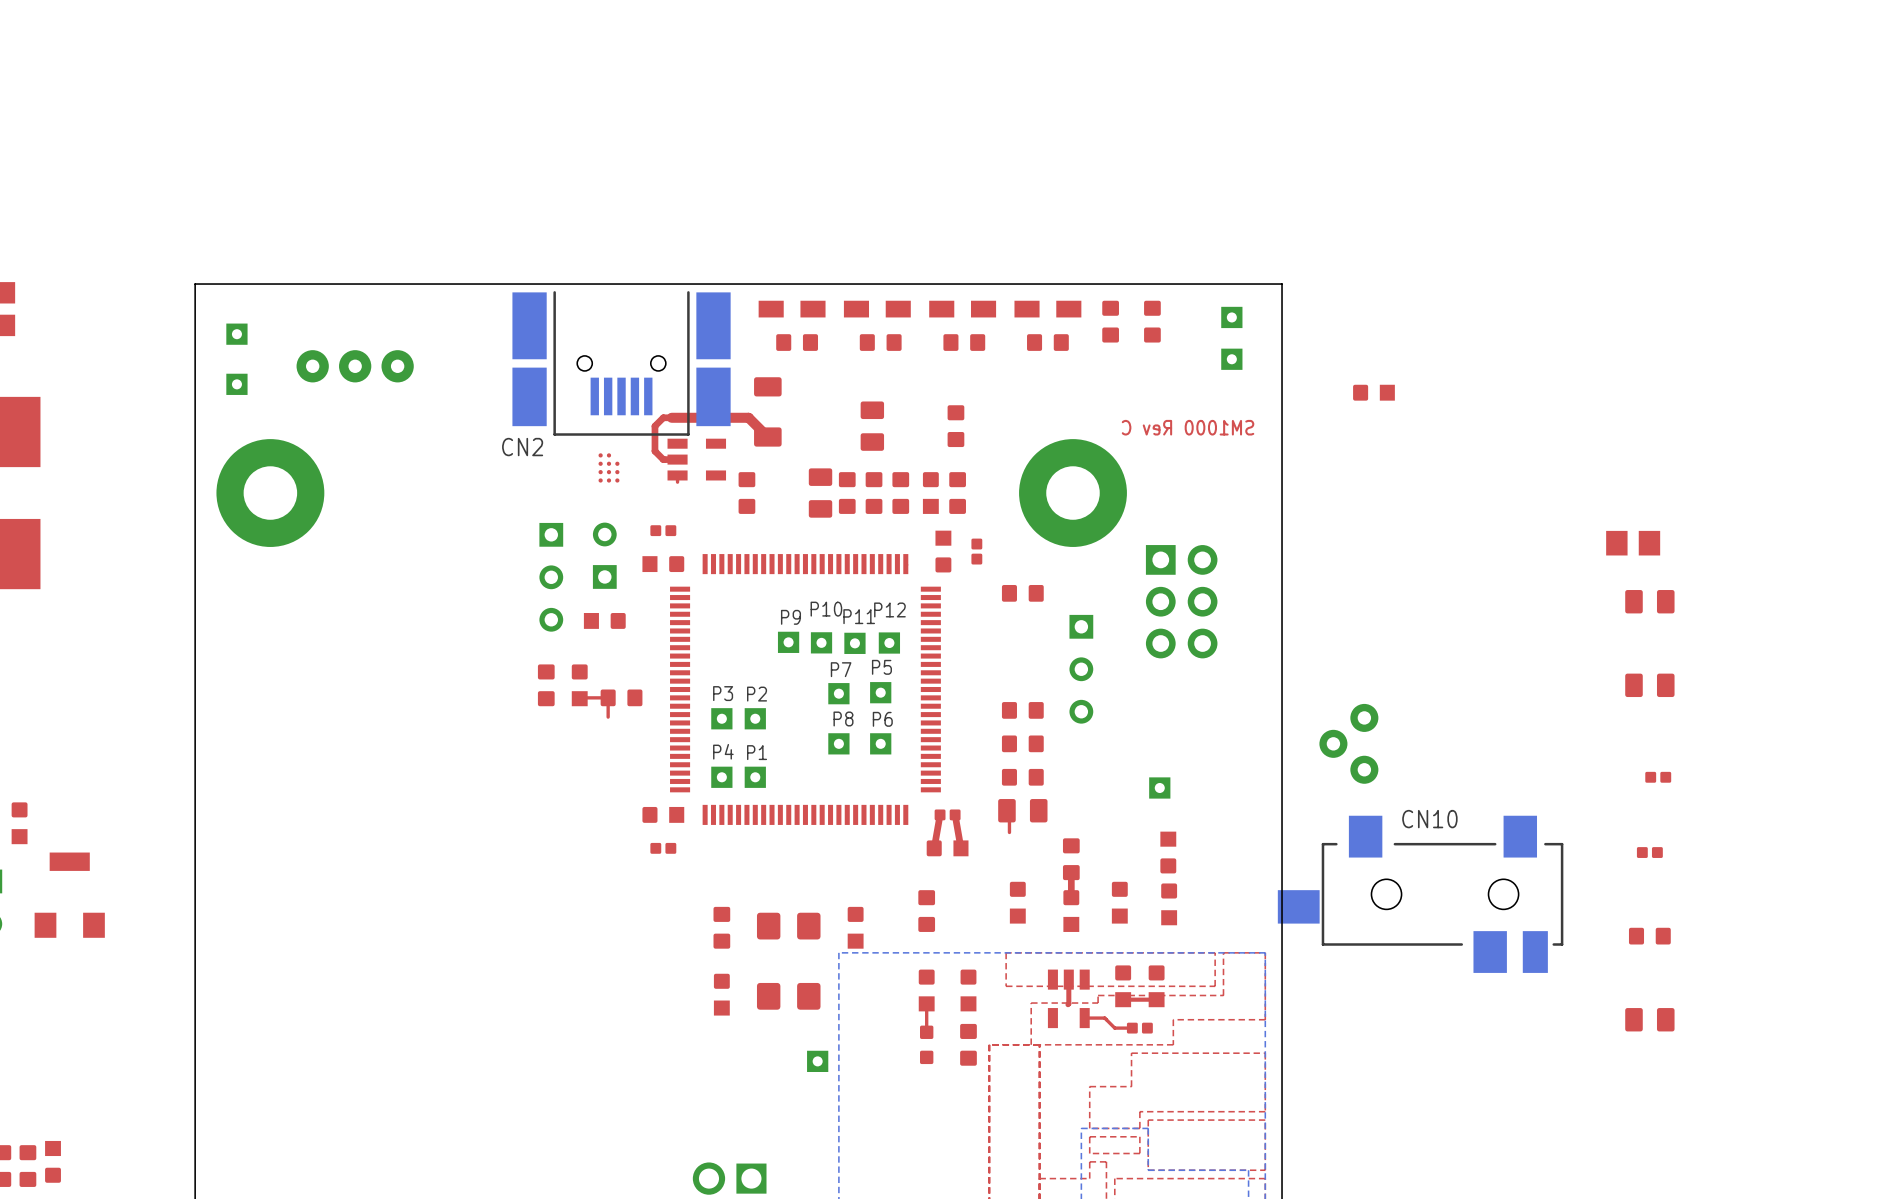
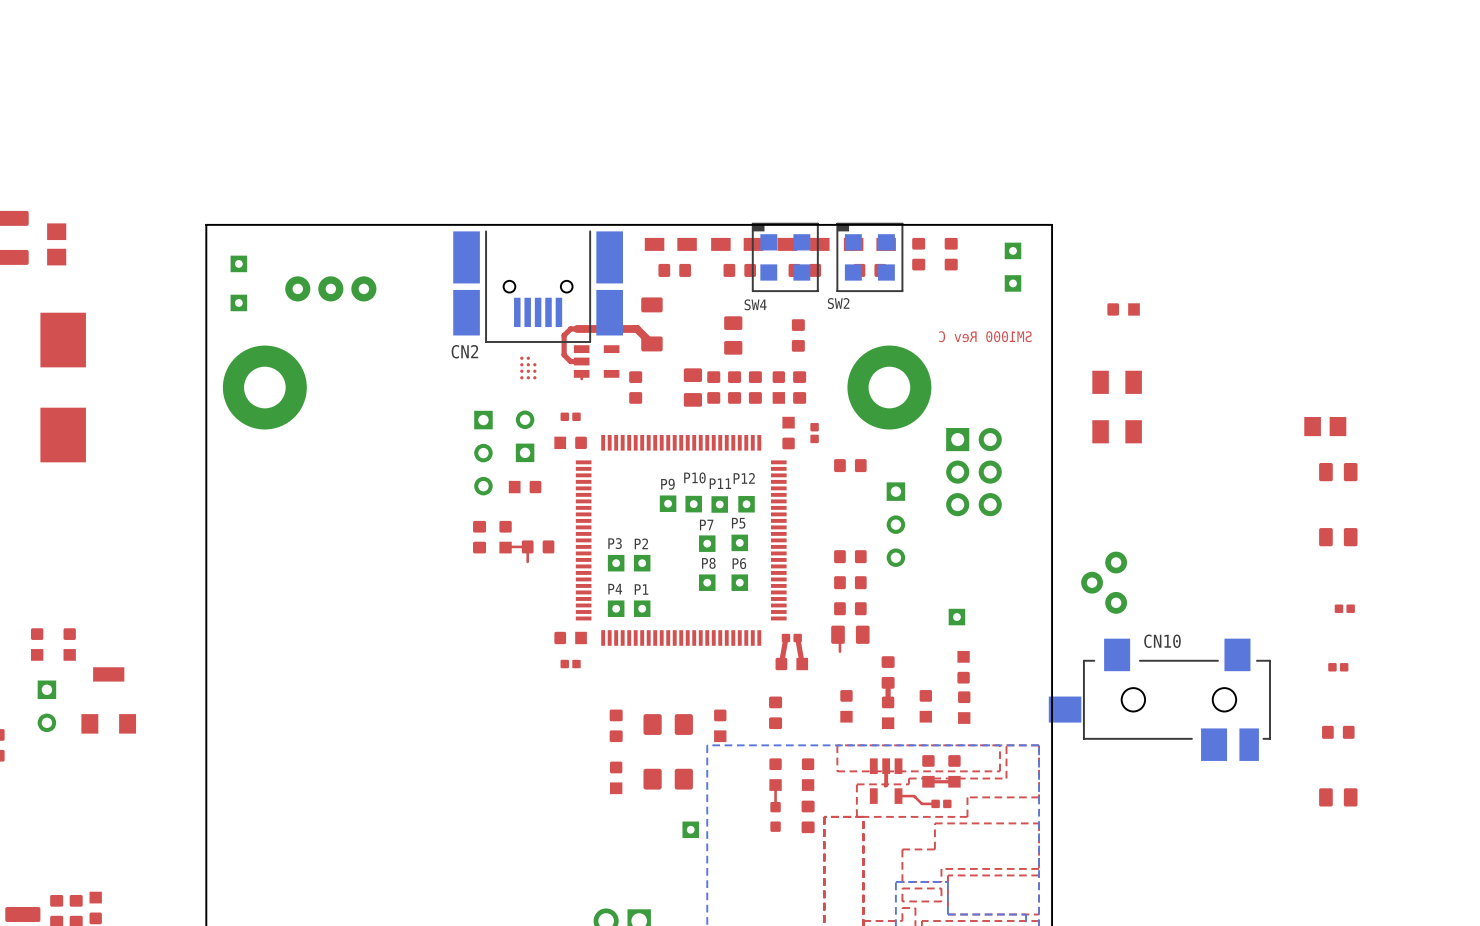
SW4: none -> (785, 257)
SW2: none -> (869, 257)
part: none -> (1117, 407)

